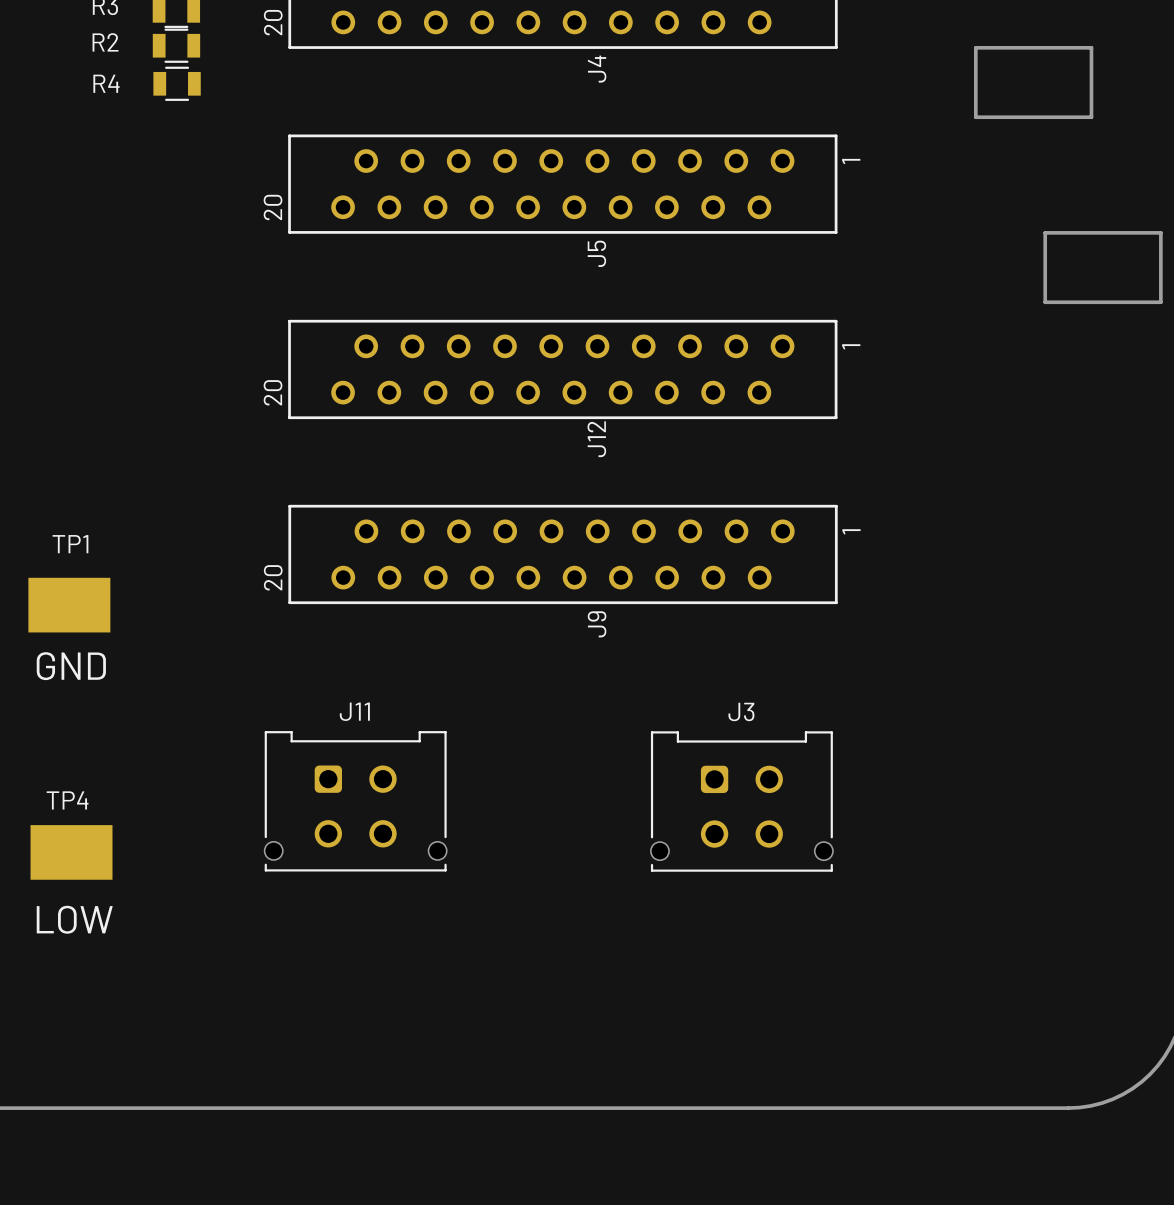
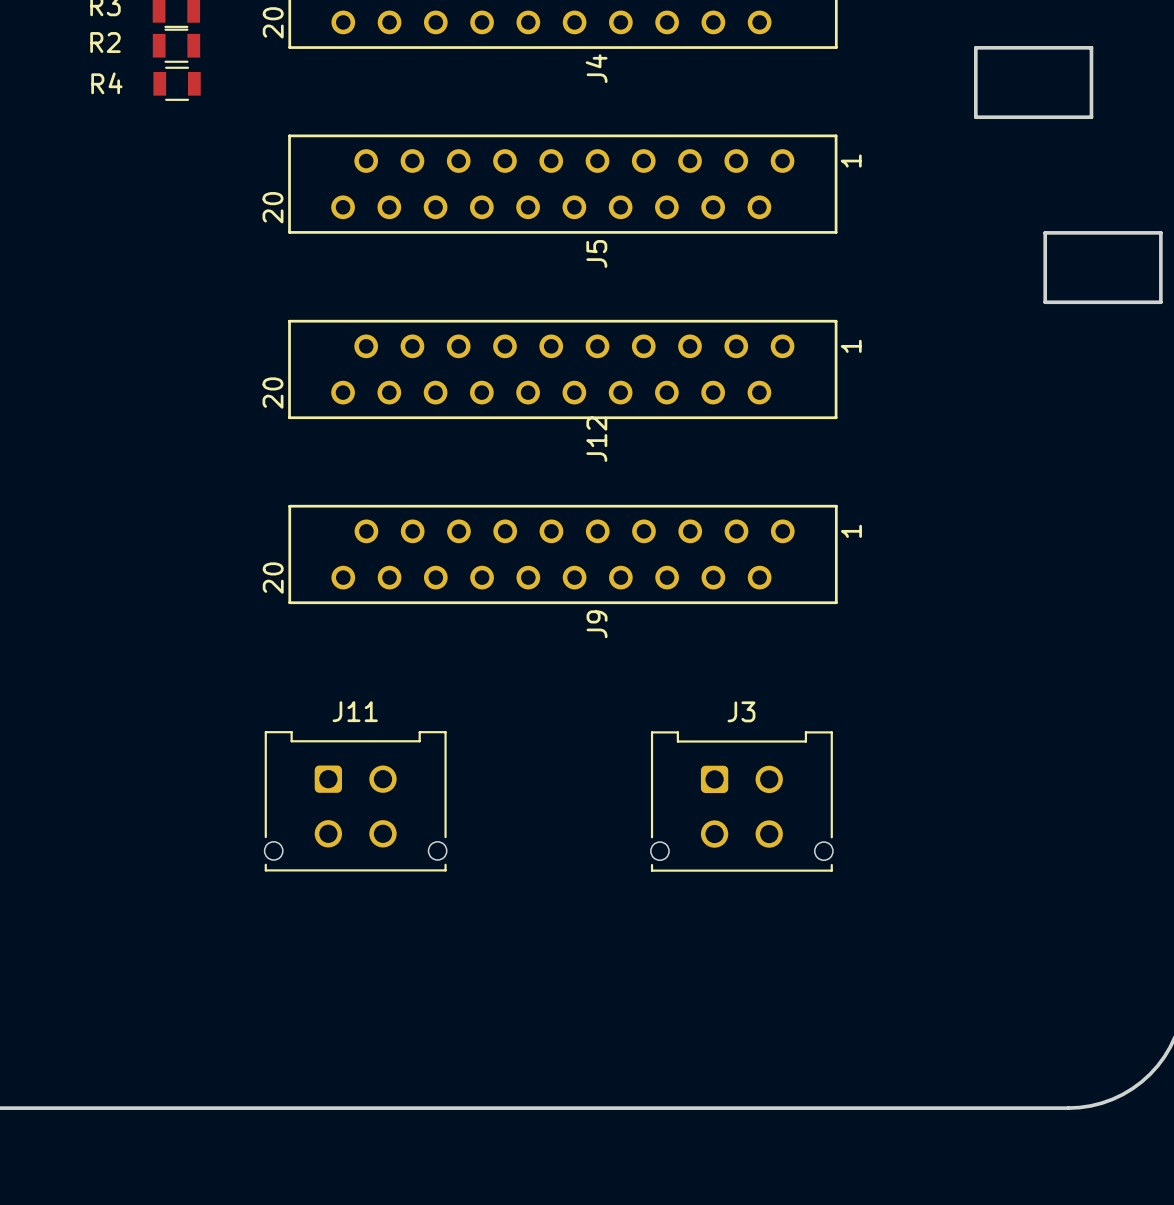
TP1: (69, 605) -> none
text: GND (71, 666) -> none
TP4: (71, 852) -> none
text: LOW (74, 919) -> none

